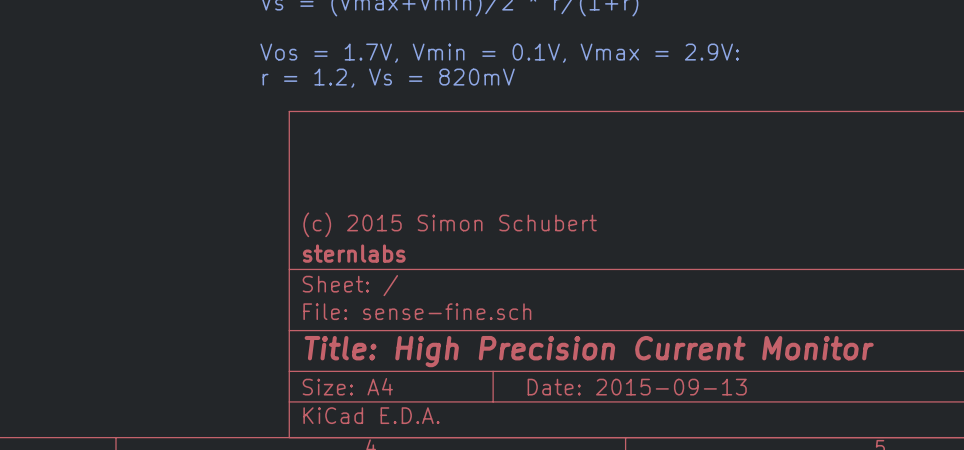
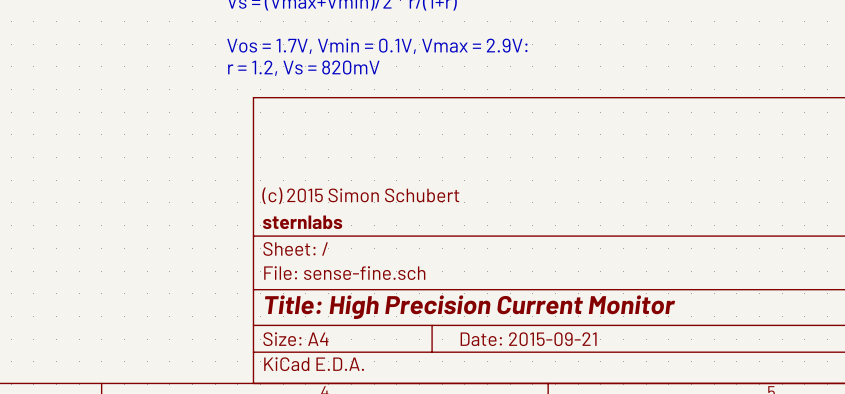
title block: Date: 2015-09-13 (637, 387) -> Date: 2015-09-21 (528, 339)

